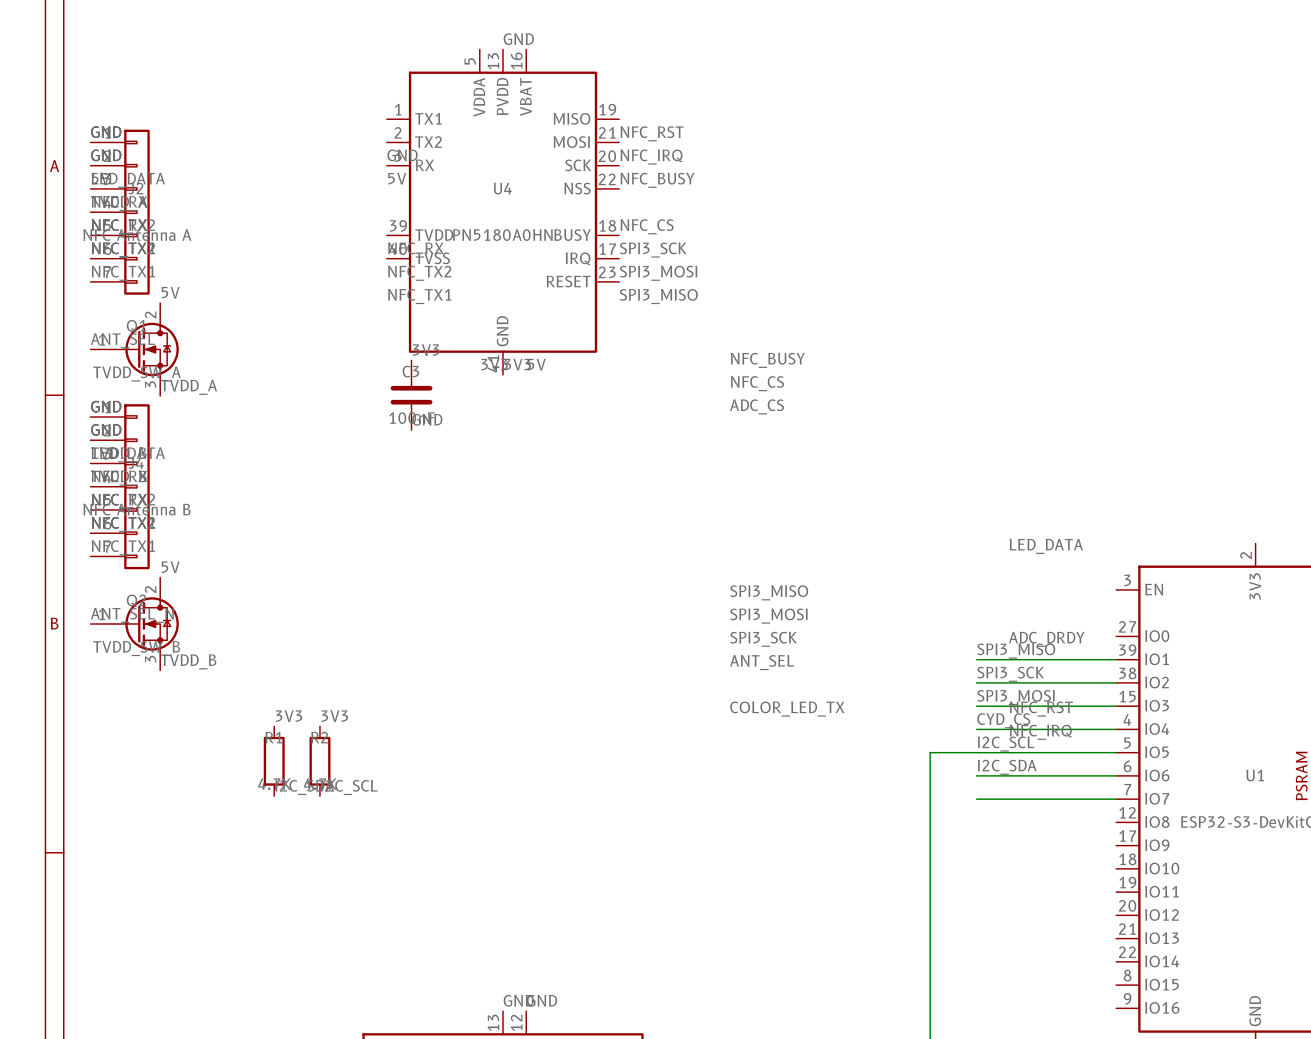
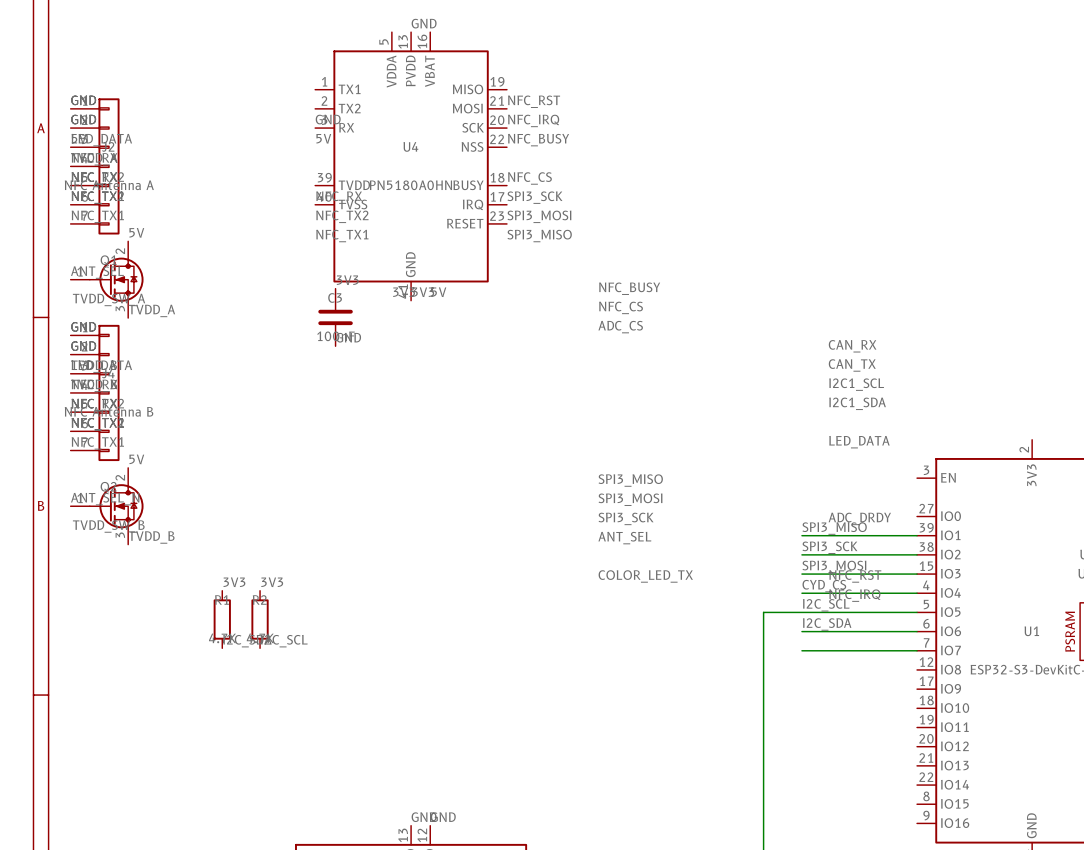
label: none -> CAN_RX (852, 346)
label: none -> CAN_TX (852, 365)
label: none -> I2C1_SCL (856, 384)
label: none -> I2C1_SDA (857, 403)

